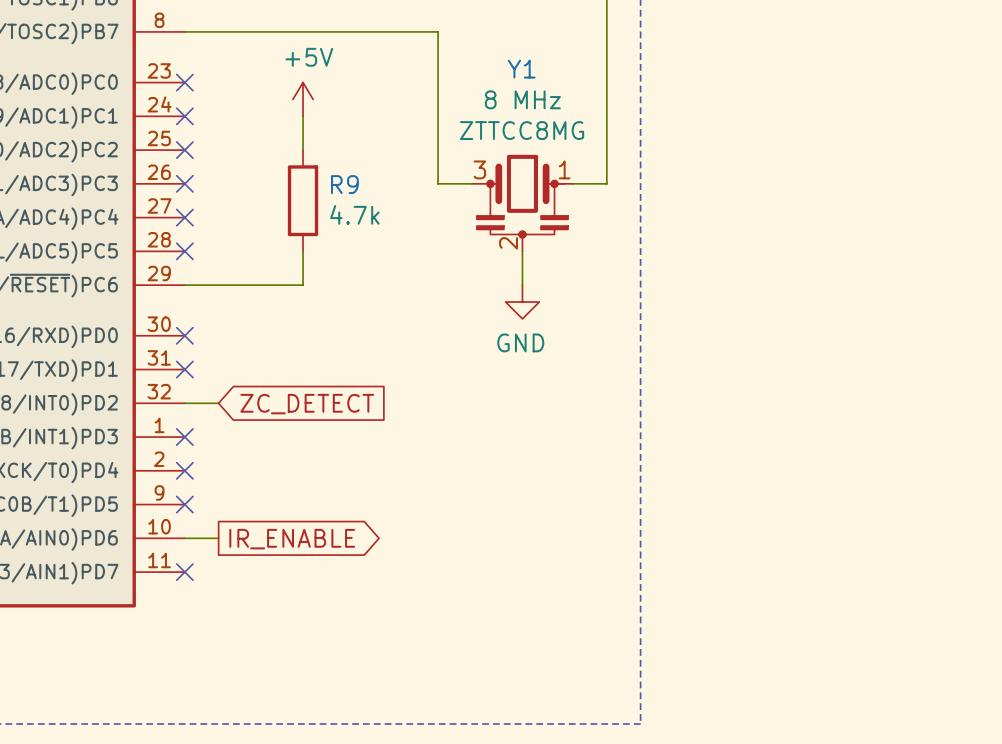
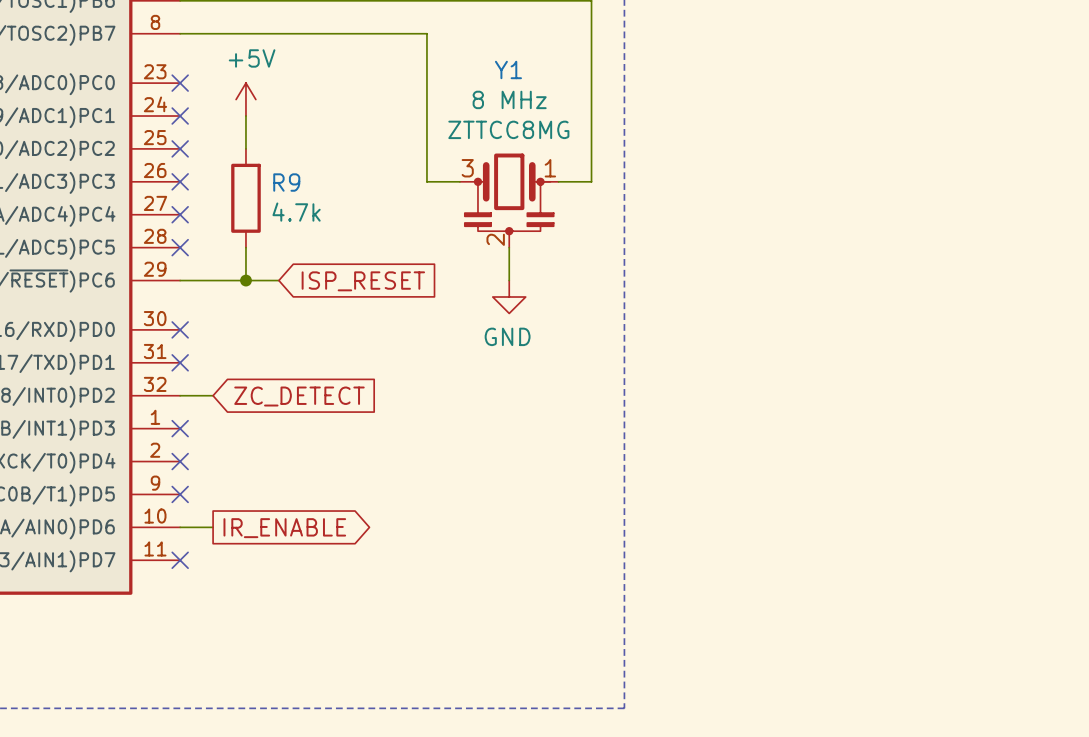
power symbol position: +5V (303, 99) -> +5V (245, 99)
wire: (303, 116) (303, 150) -> (245, 116) (245, 148)
R9 position: (303, 200) -> (245, 198)
wire: none -> (245, 247) (245, 280)
wire: (303, 251) (303, 285) (286, 285) -> none
junction: none -> (245, 280)
global label: none -> ISP_RESET (363, 281)

